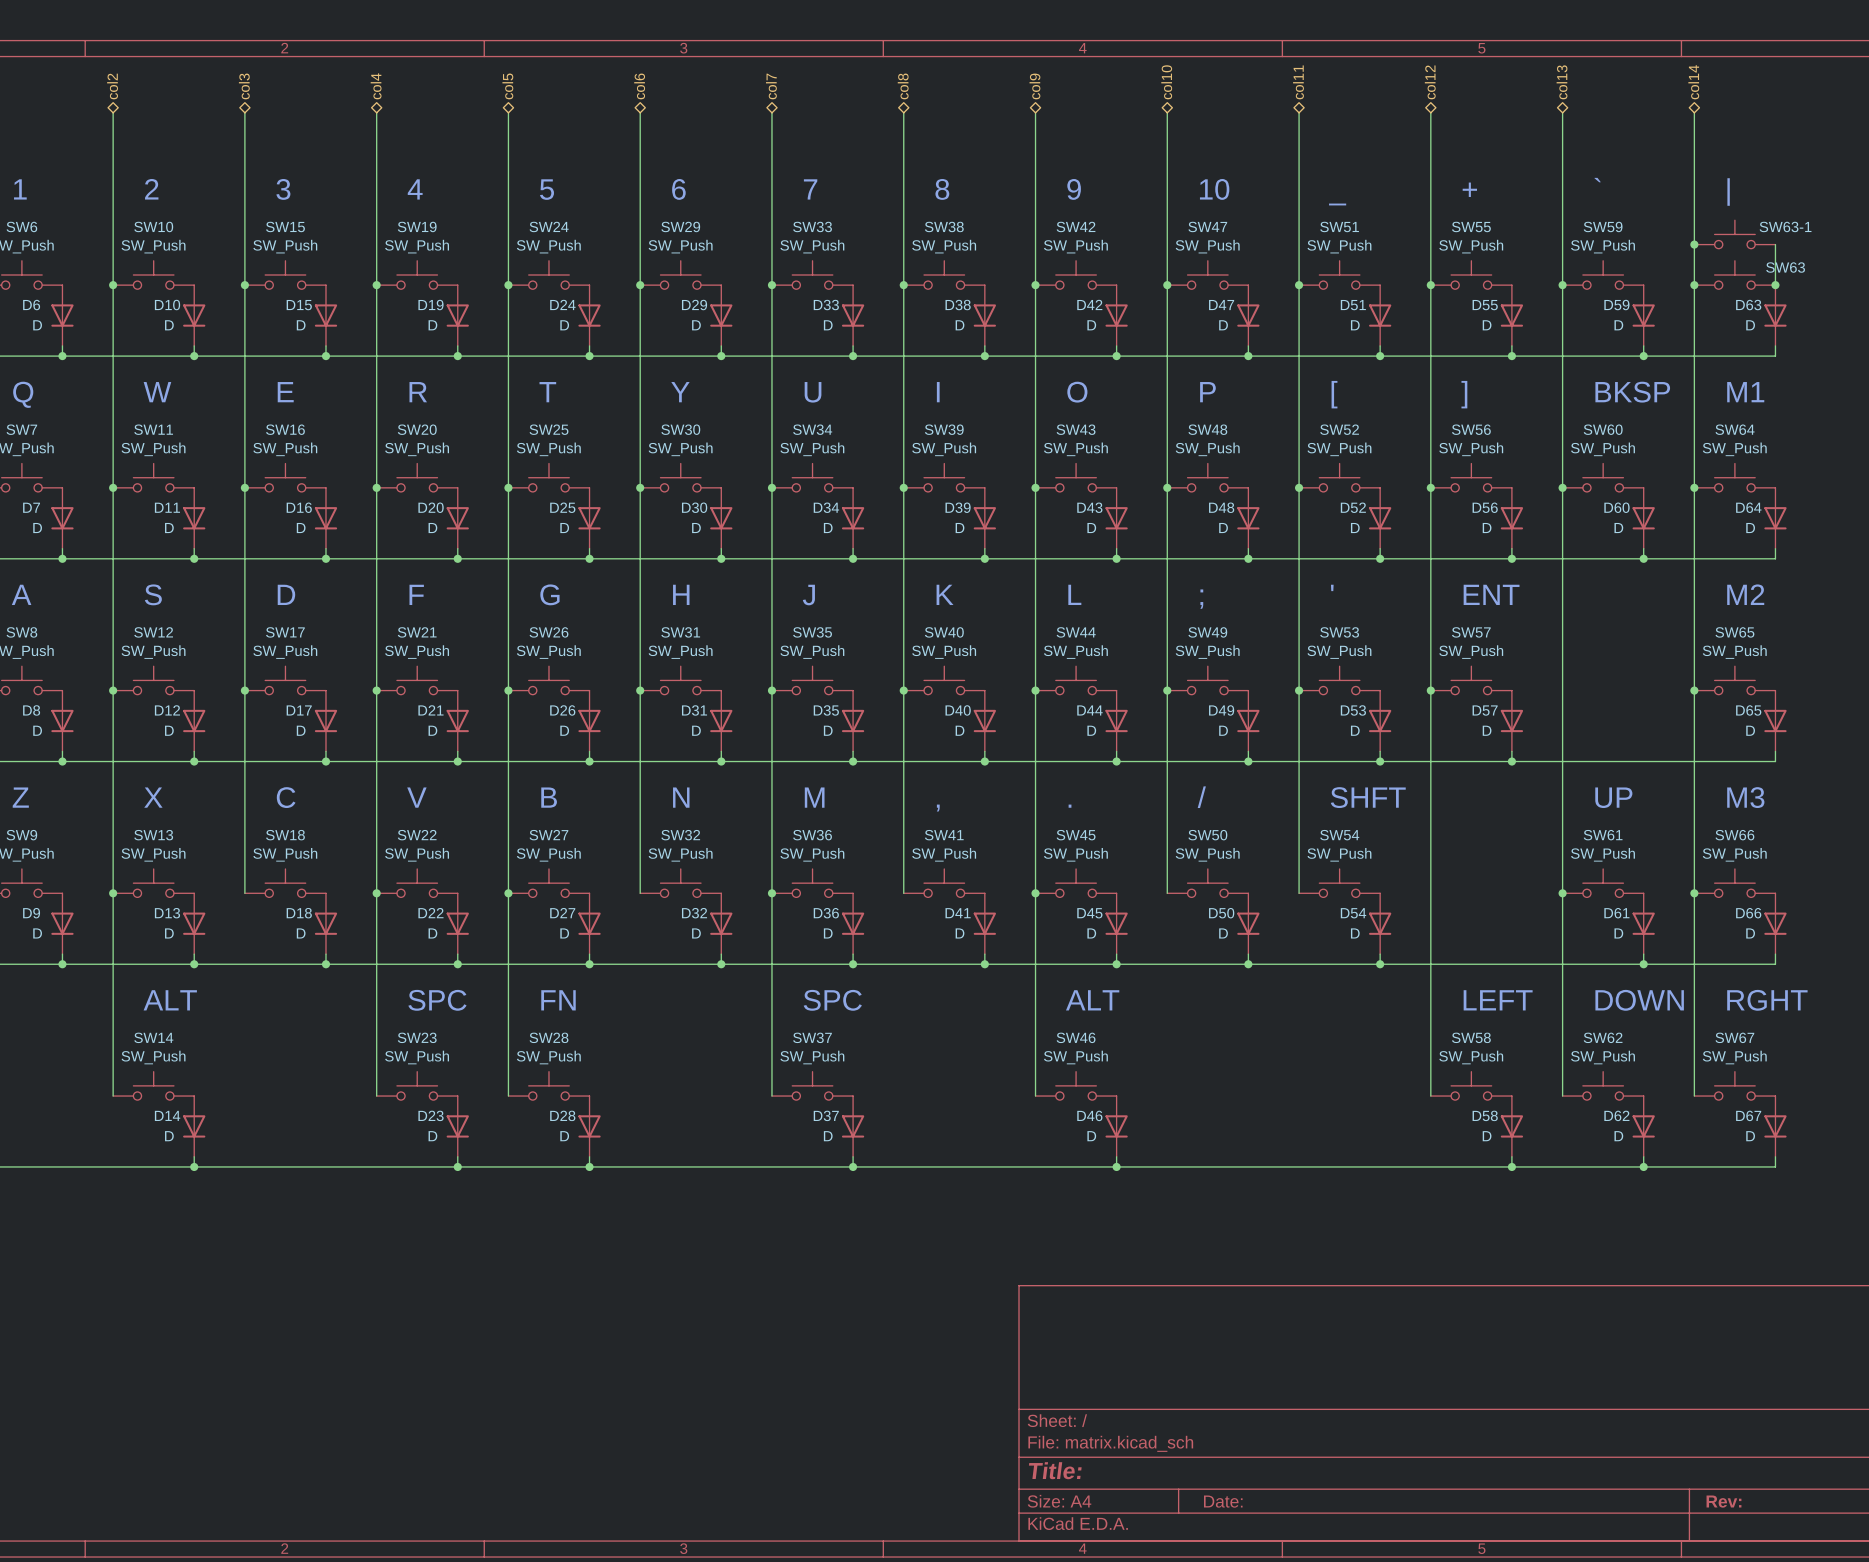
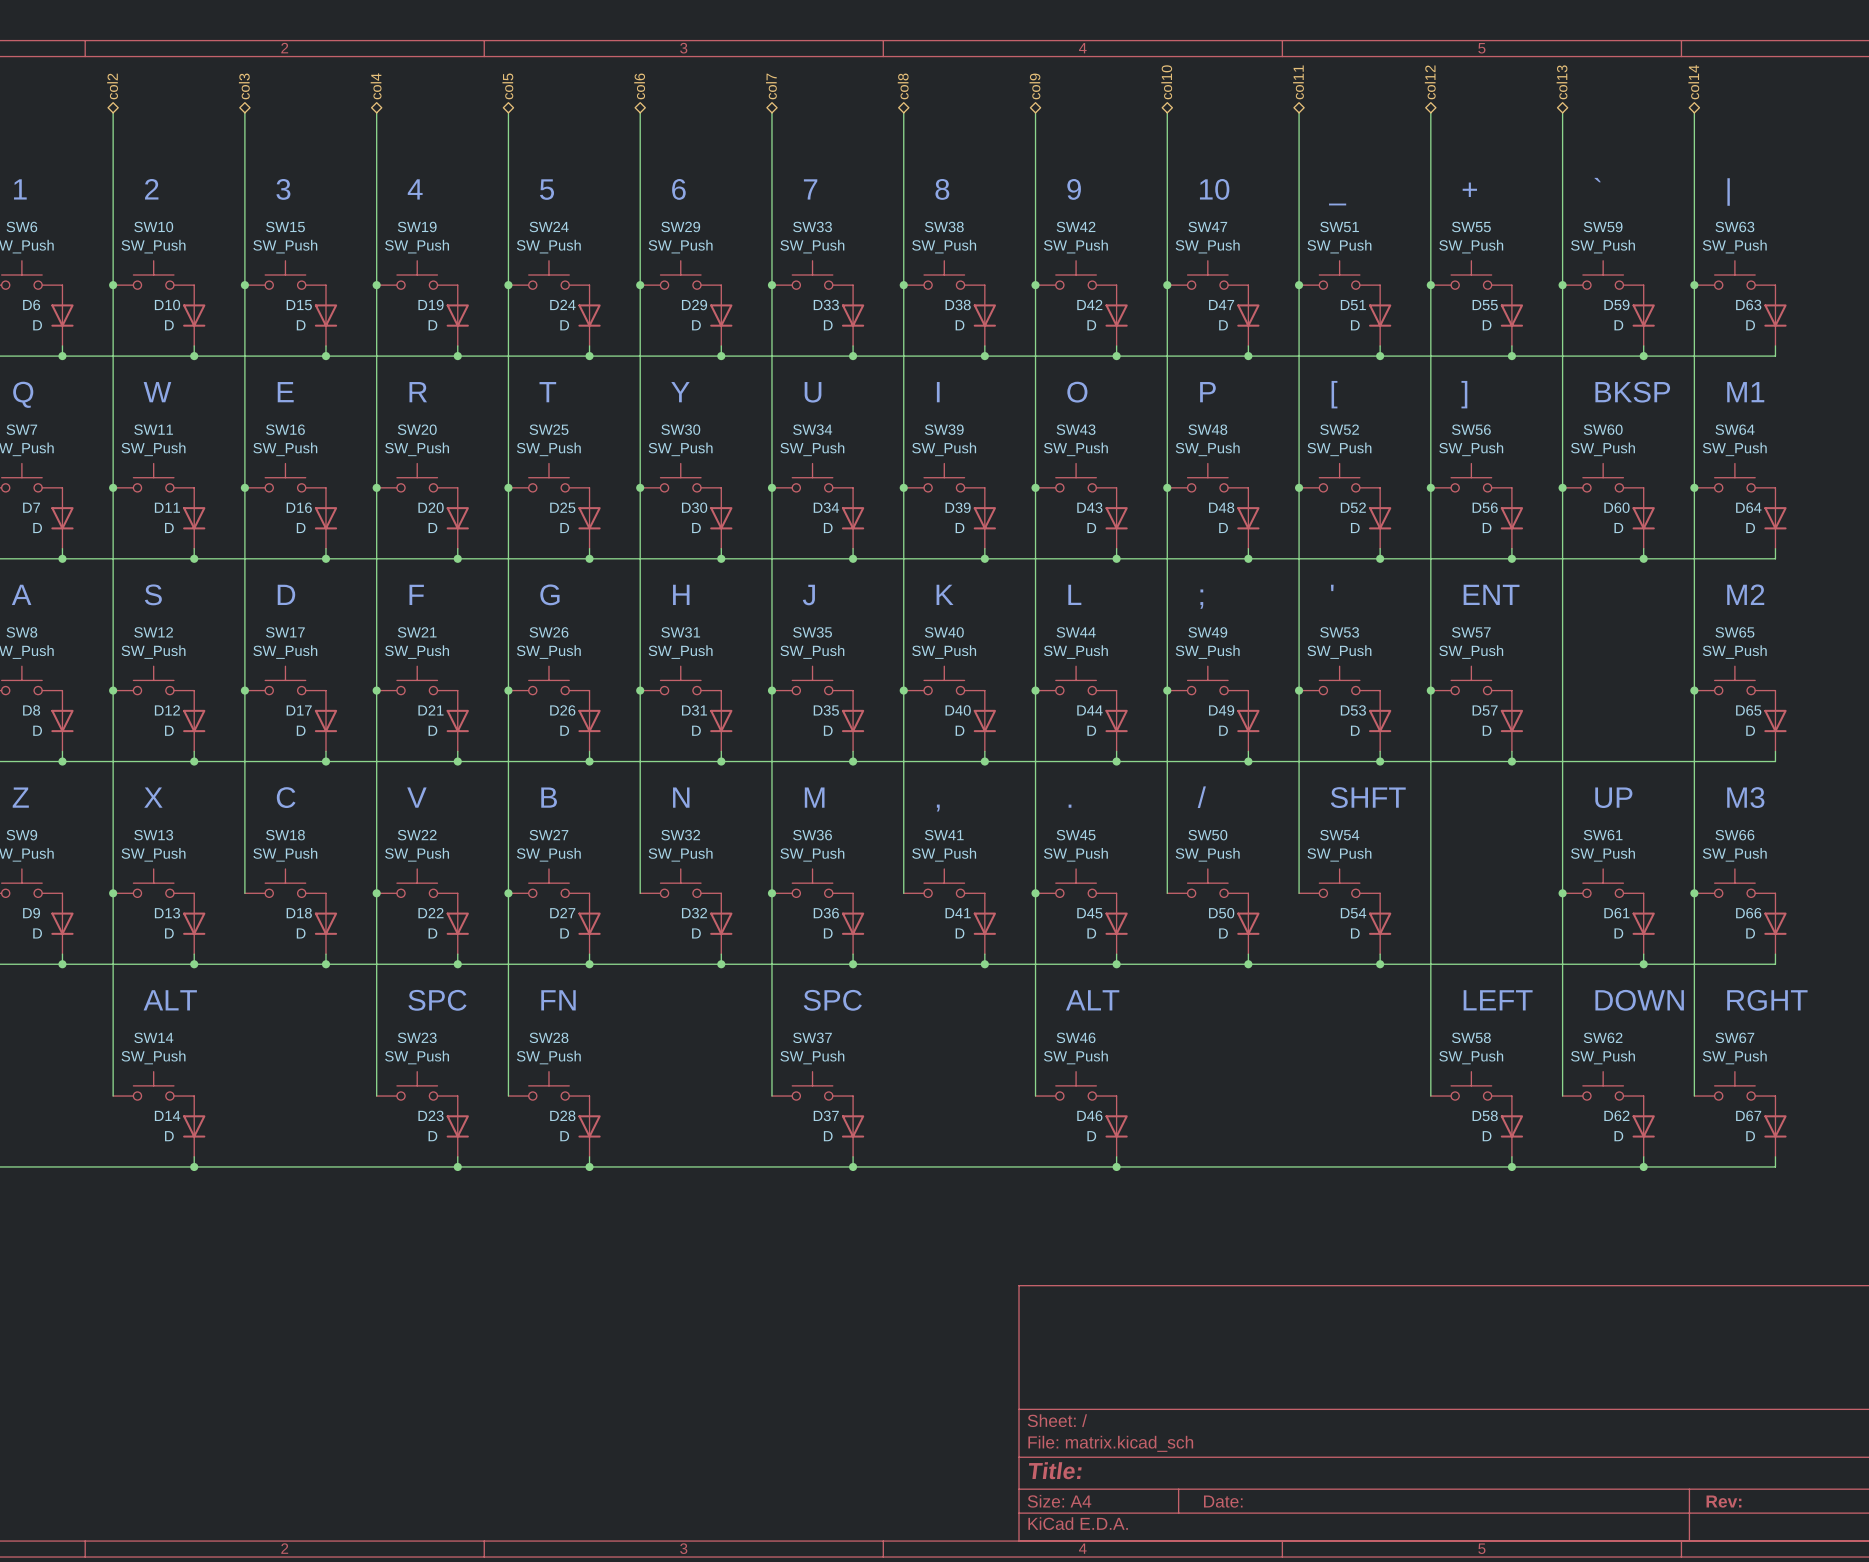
SW63-1: (1734, 234) -> none
junction: (1694, 244) -> none
wire: (1775, 244) (1775, 285) -> none
SW63 value: none -> SW_Push (1734, 246)
SW63 name position: SW63 (1785, 267) -> SW63 (1734, 226)
junction: (1775, 285) -> none

